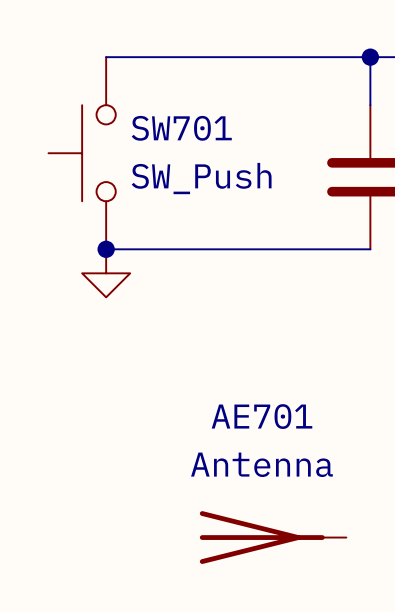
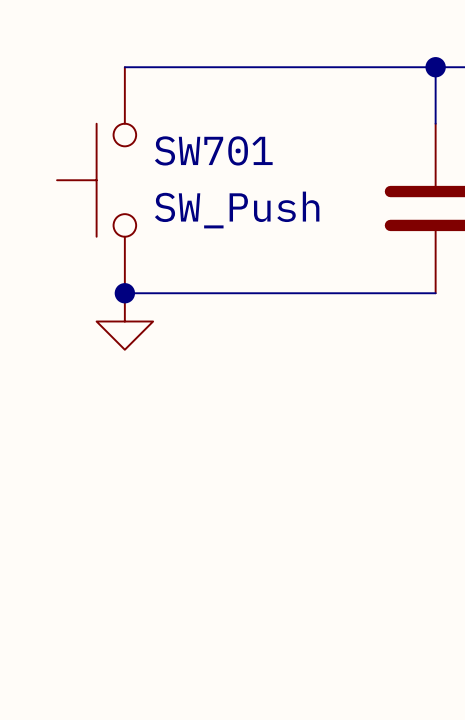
AE701: Antenna (273, 537) -> none

